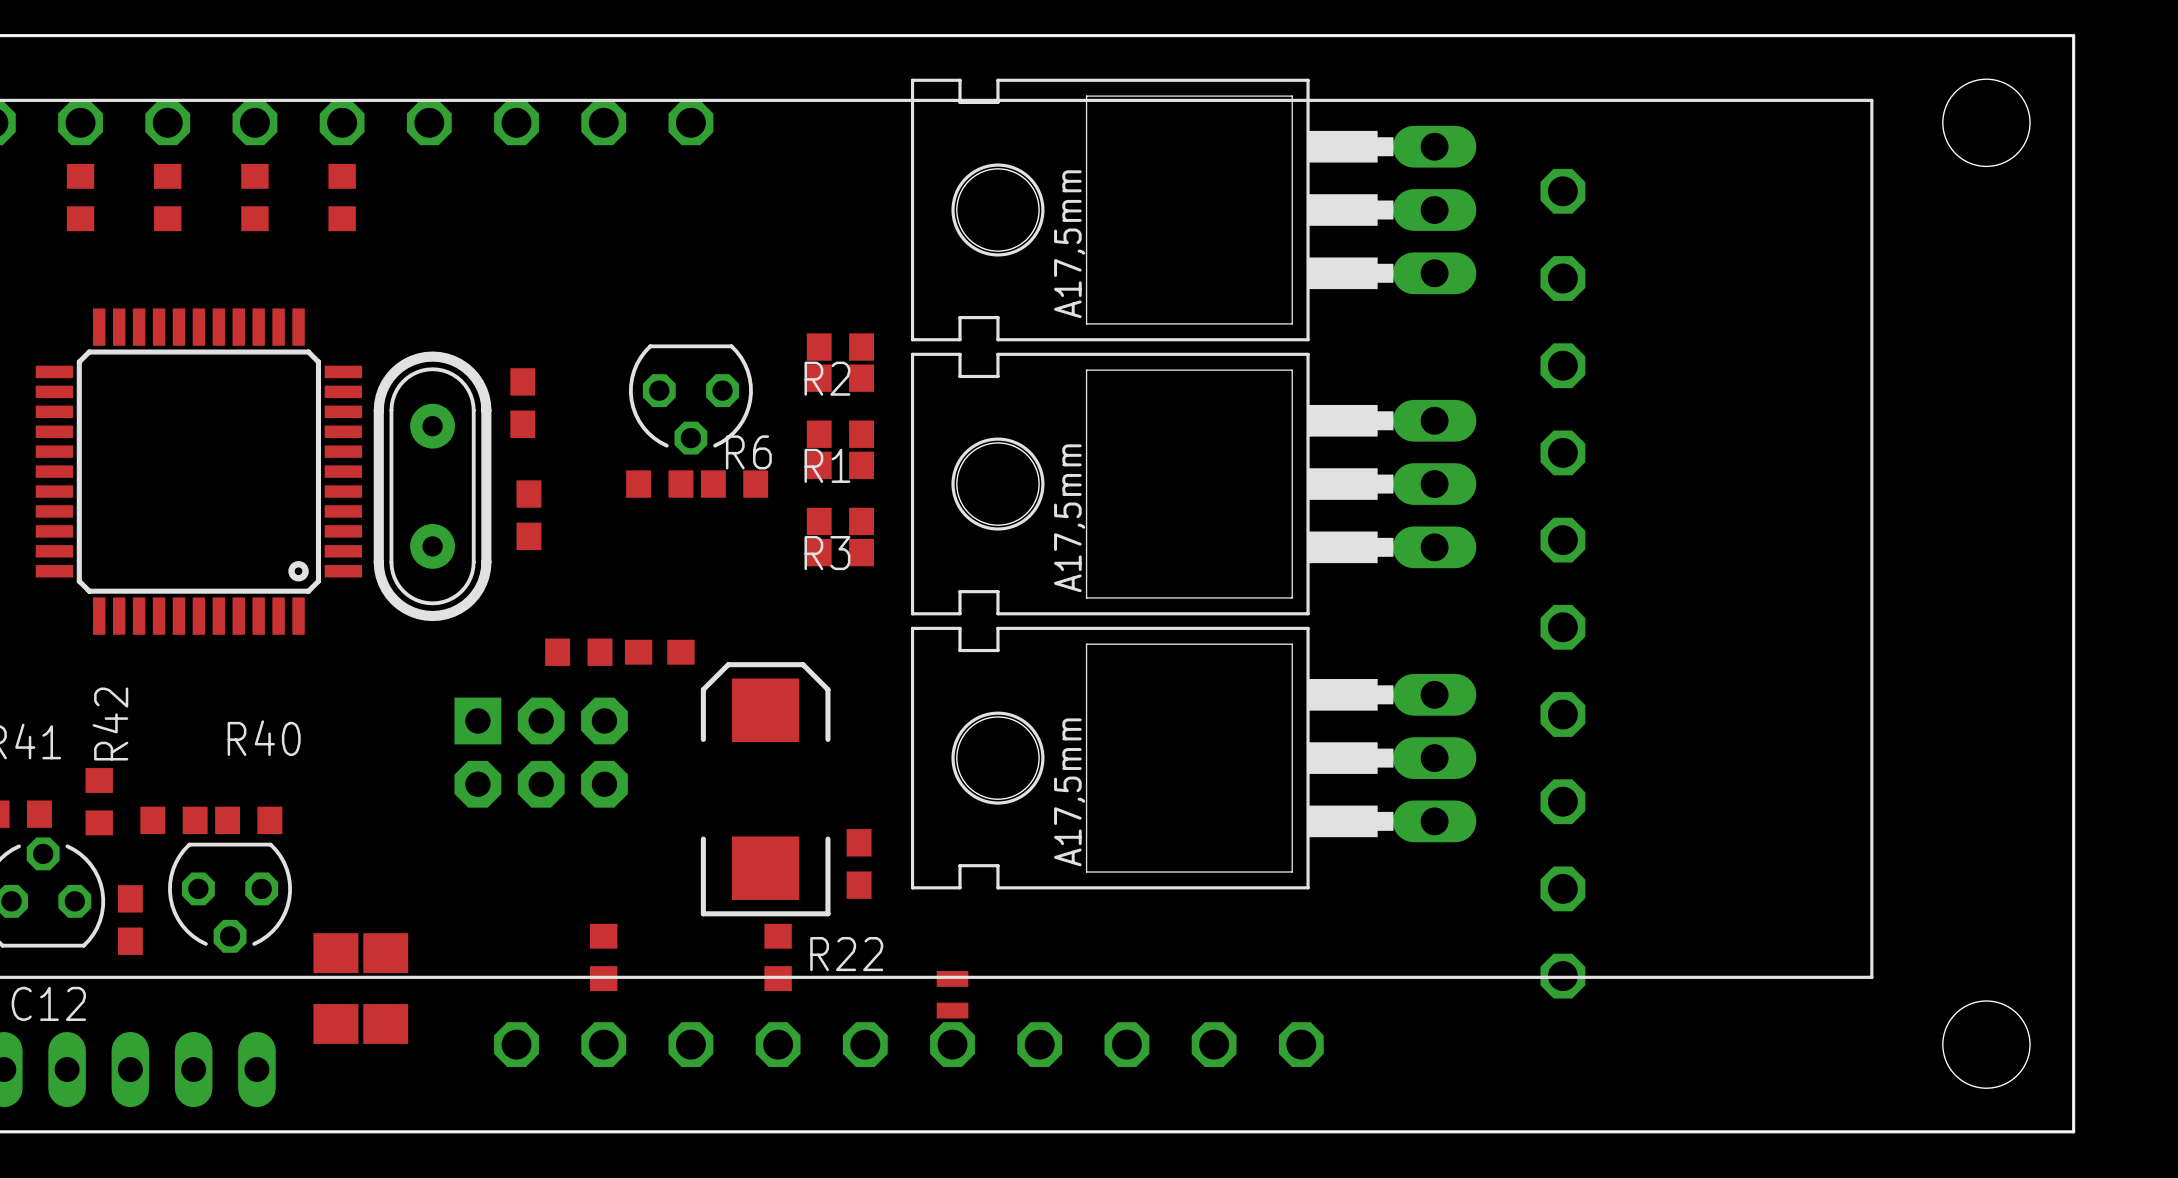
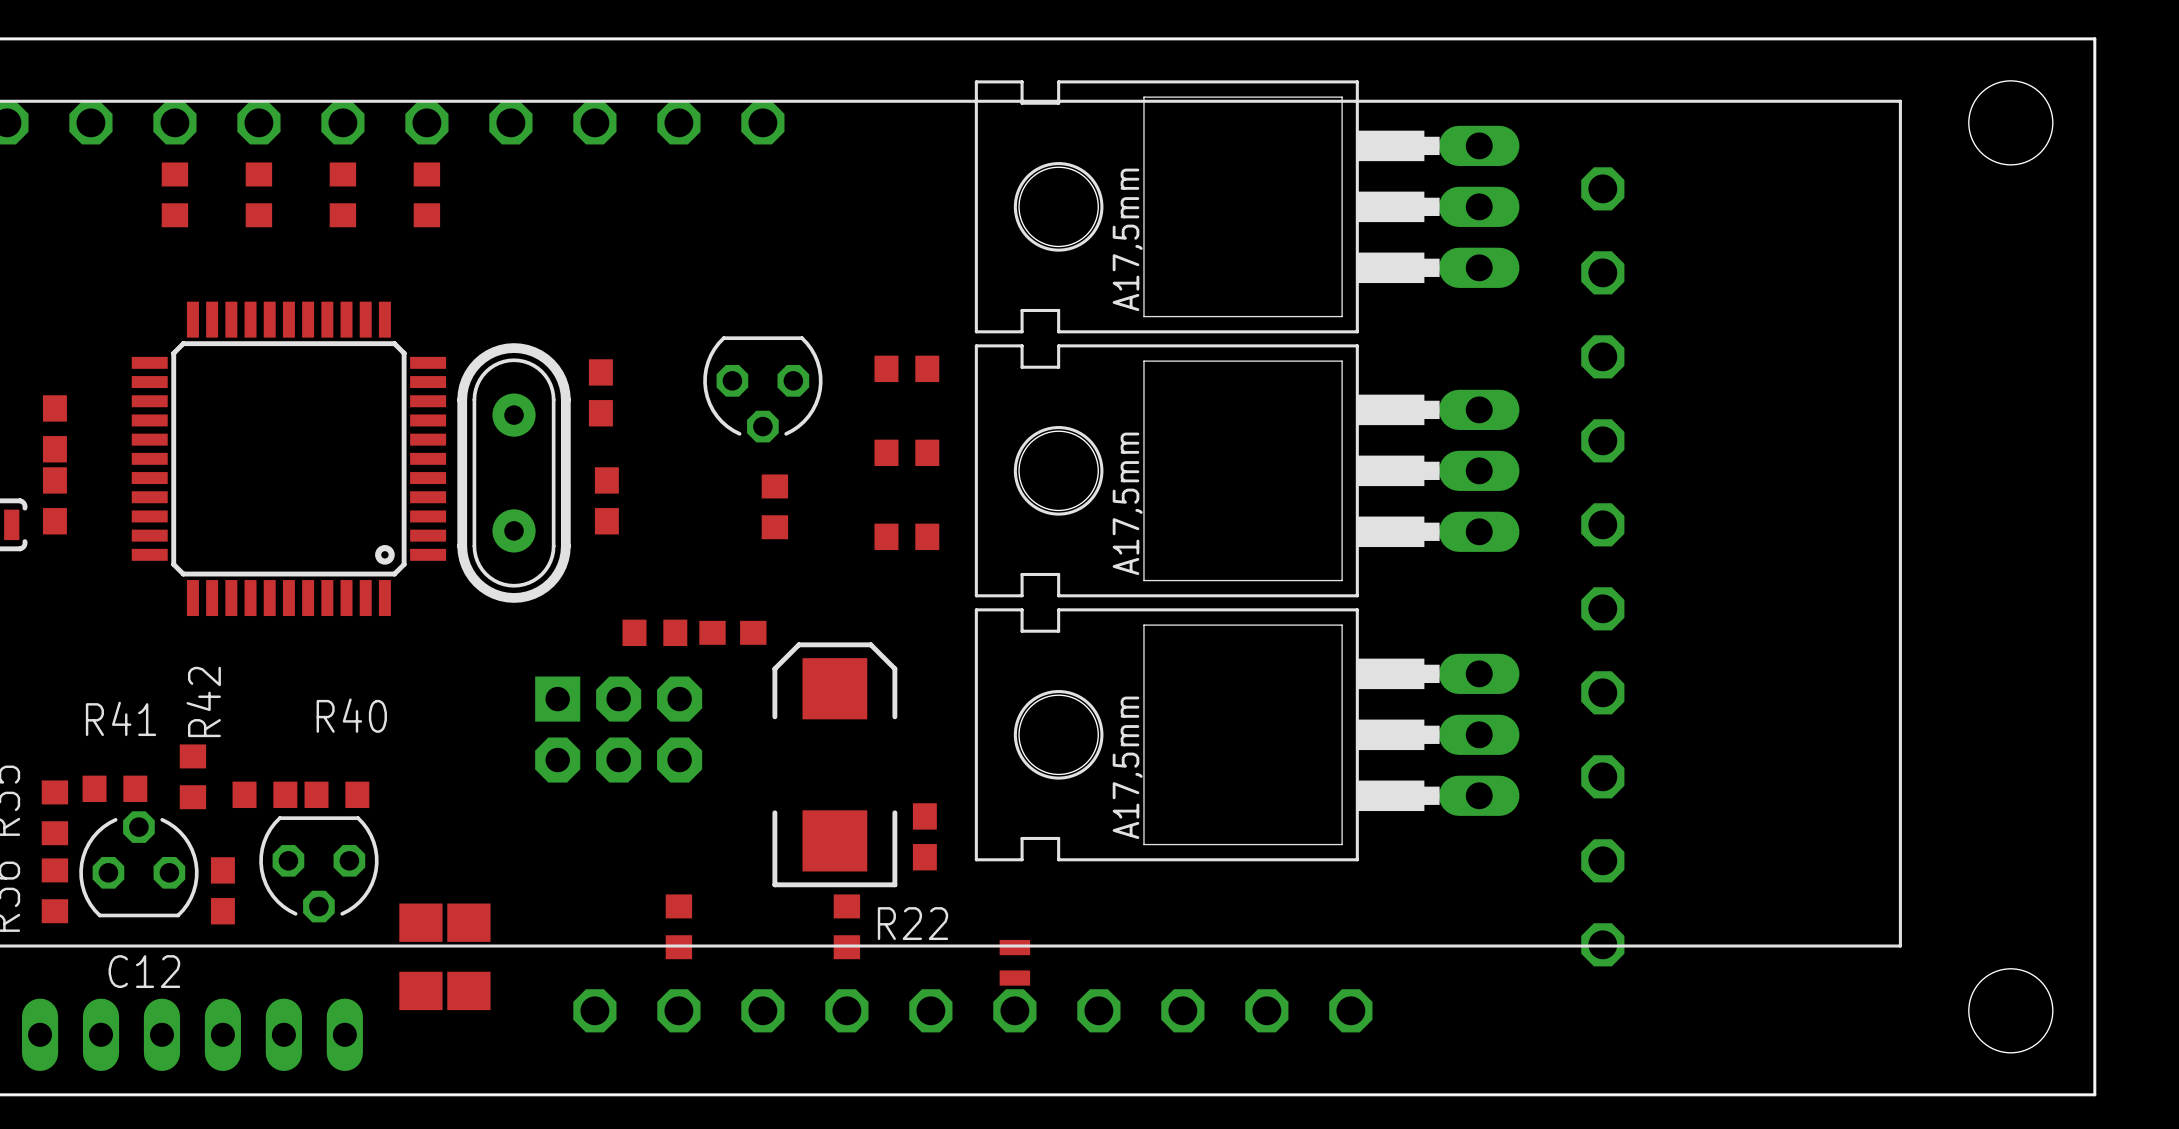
R2: (840, 347) -> none
R1: (840, 434) -> none
part rotation: 0° (659, 484) -> 90° clockwise (774, 506)
part position: (659, 484) -> (774, 506)
R6: (734, 484) -> none
R3: (840, 521) -> none

